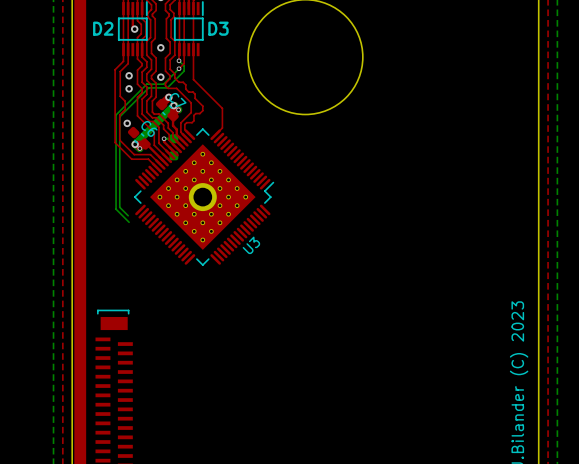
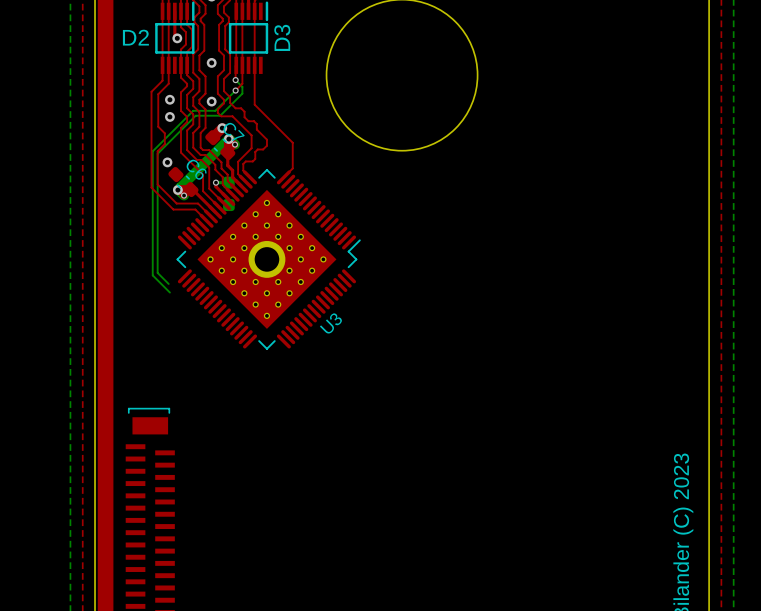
D3 name rotation: 0° (218, 28) -> 90° counterclockwise (282, 37)

